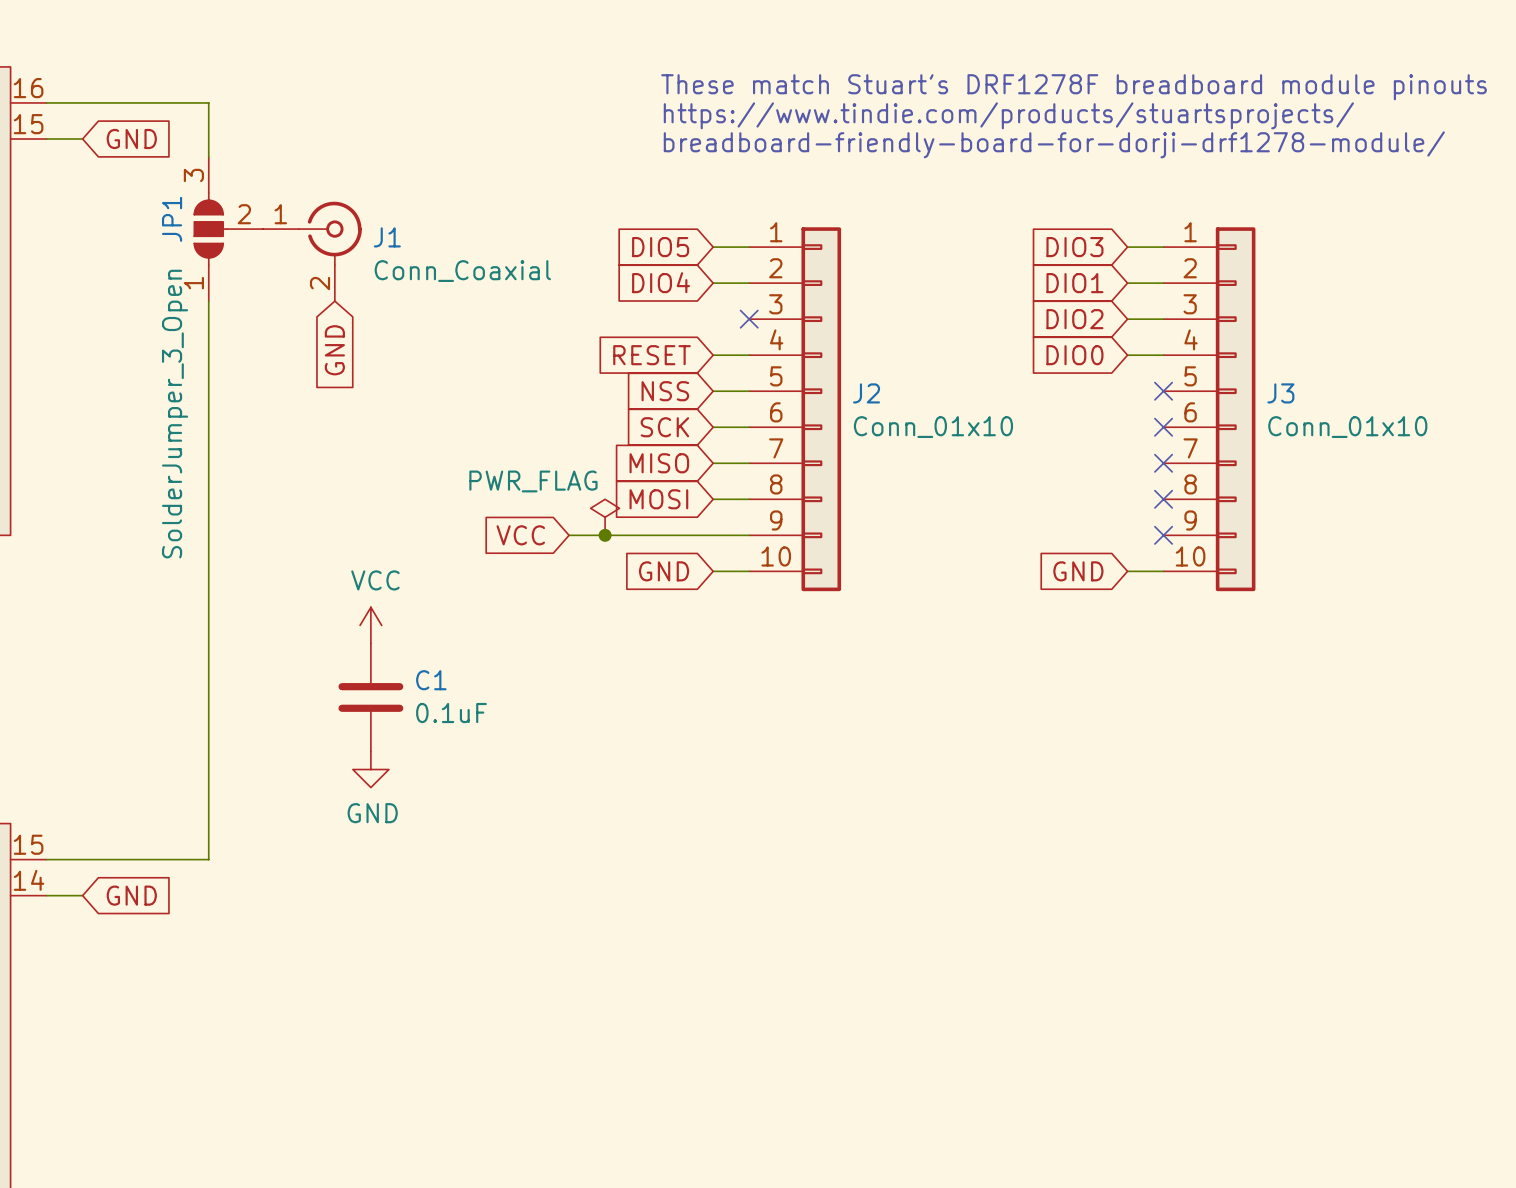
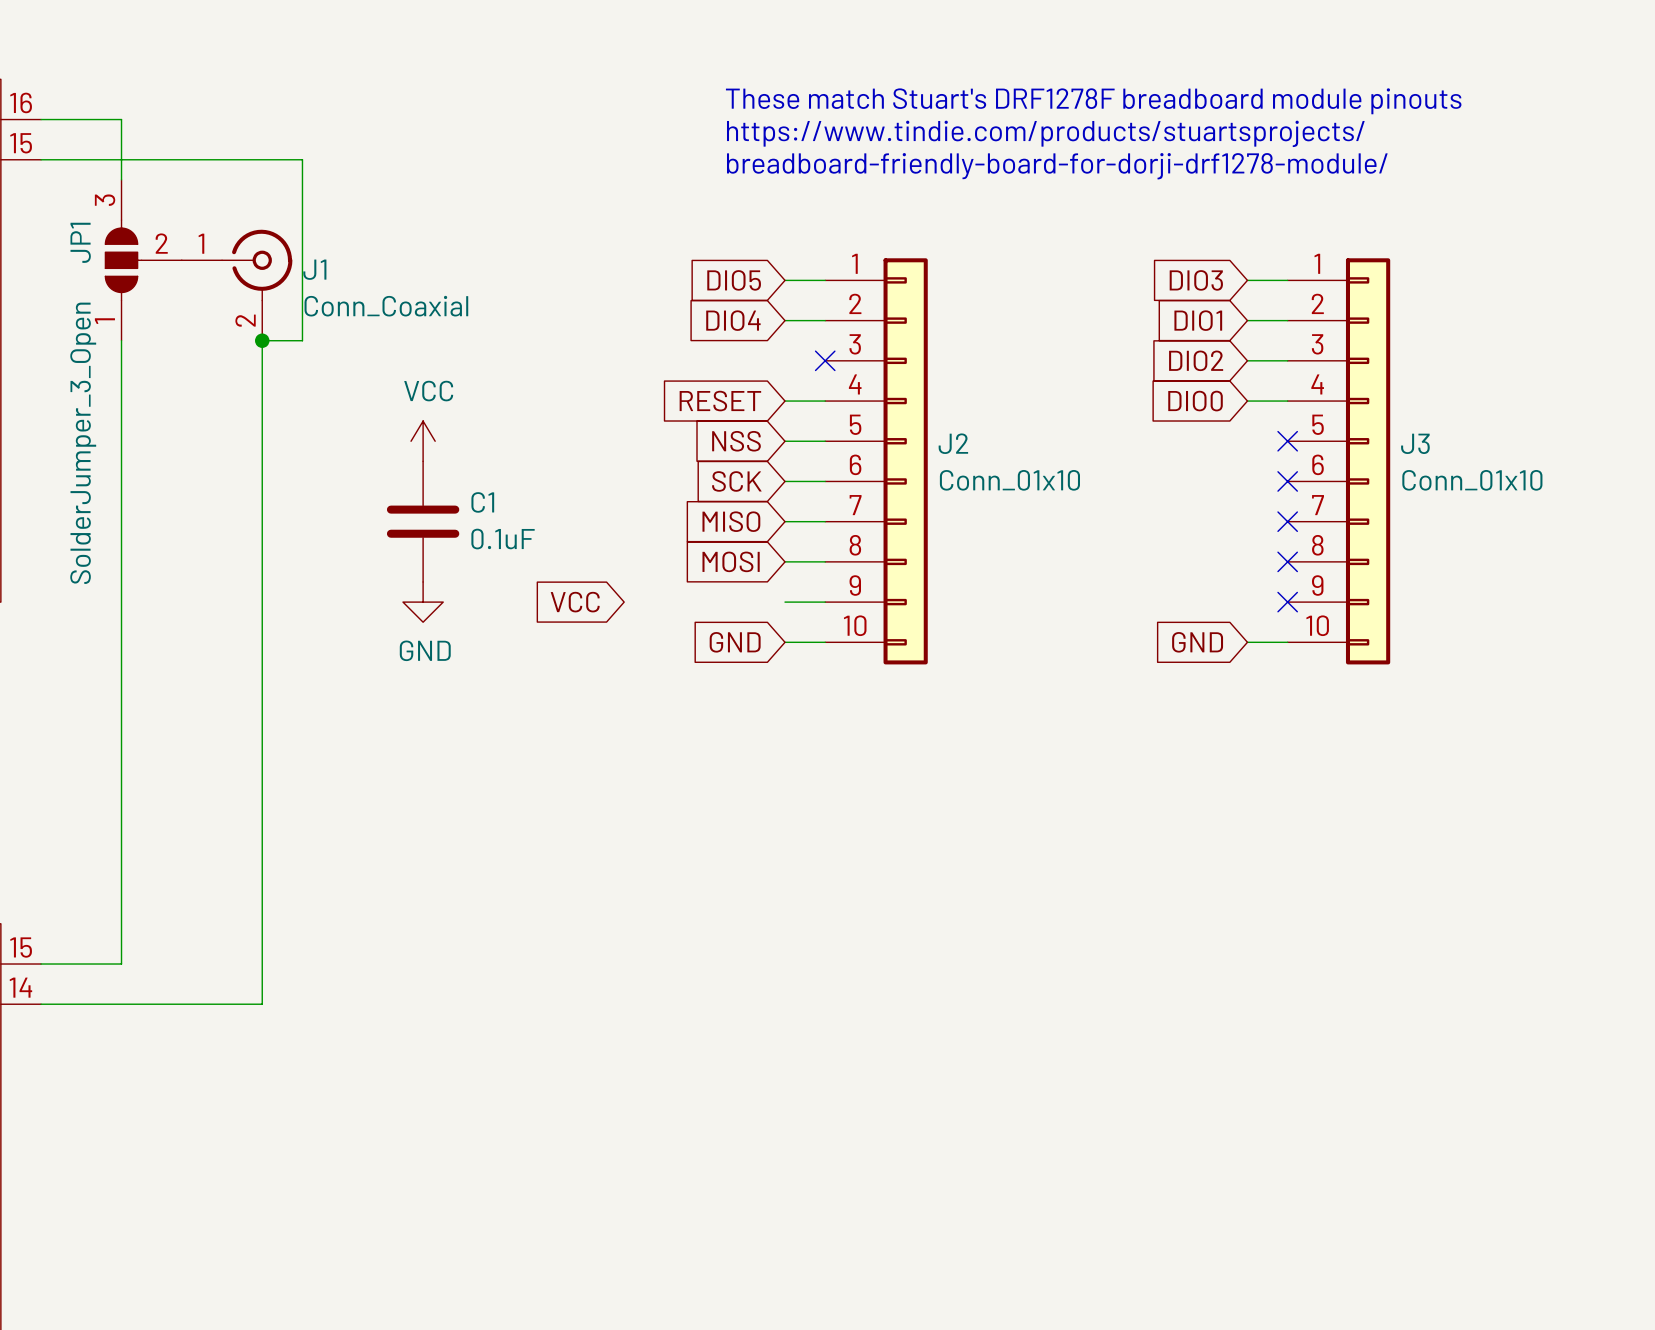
wire: (118, 102) (208, 102) (208, 157) -> (121, 119) (121, 179)
wire: none -> (81, 159) (302, 159) (302, 340) (262, 340) (262, 1004) (81, 1004)
global label: GND (131, 138) -> none
JP1 position: (228, 229) -> (143, 260)
J1 position: (312, 251) -> (237, 285)
wire: (208, 301) (208, 859) (118, 859) -> (121, 340) (121, 964)
junction: none -> (262, 340)
global label: GND (334, 350) -> none
power symbol: PWR_FLAG (605, 517) -> none
wire: (569, 535) (713, 535) -> none
junction: (605, 535) -> none
power symbol position: VCC (370, 625) -> VCC (423, 441)
C1 position: (370, 697) -> (423, 521)
power symbol position: GND (370, 769) -> GND (423, 602)
global label: GND (131, 895) -> none

